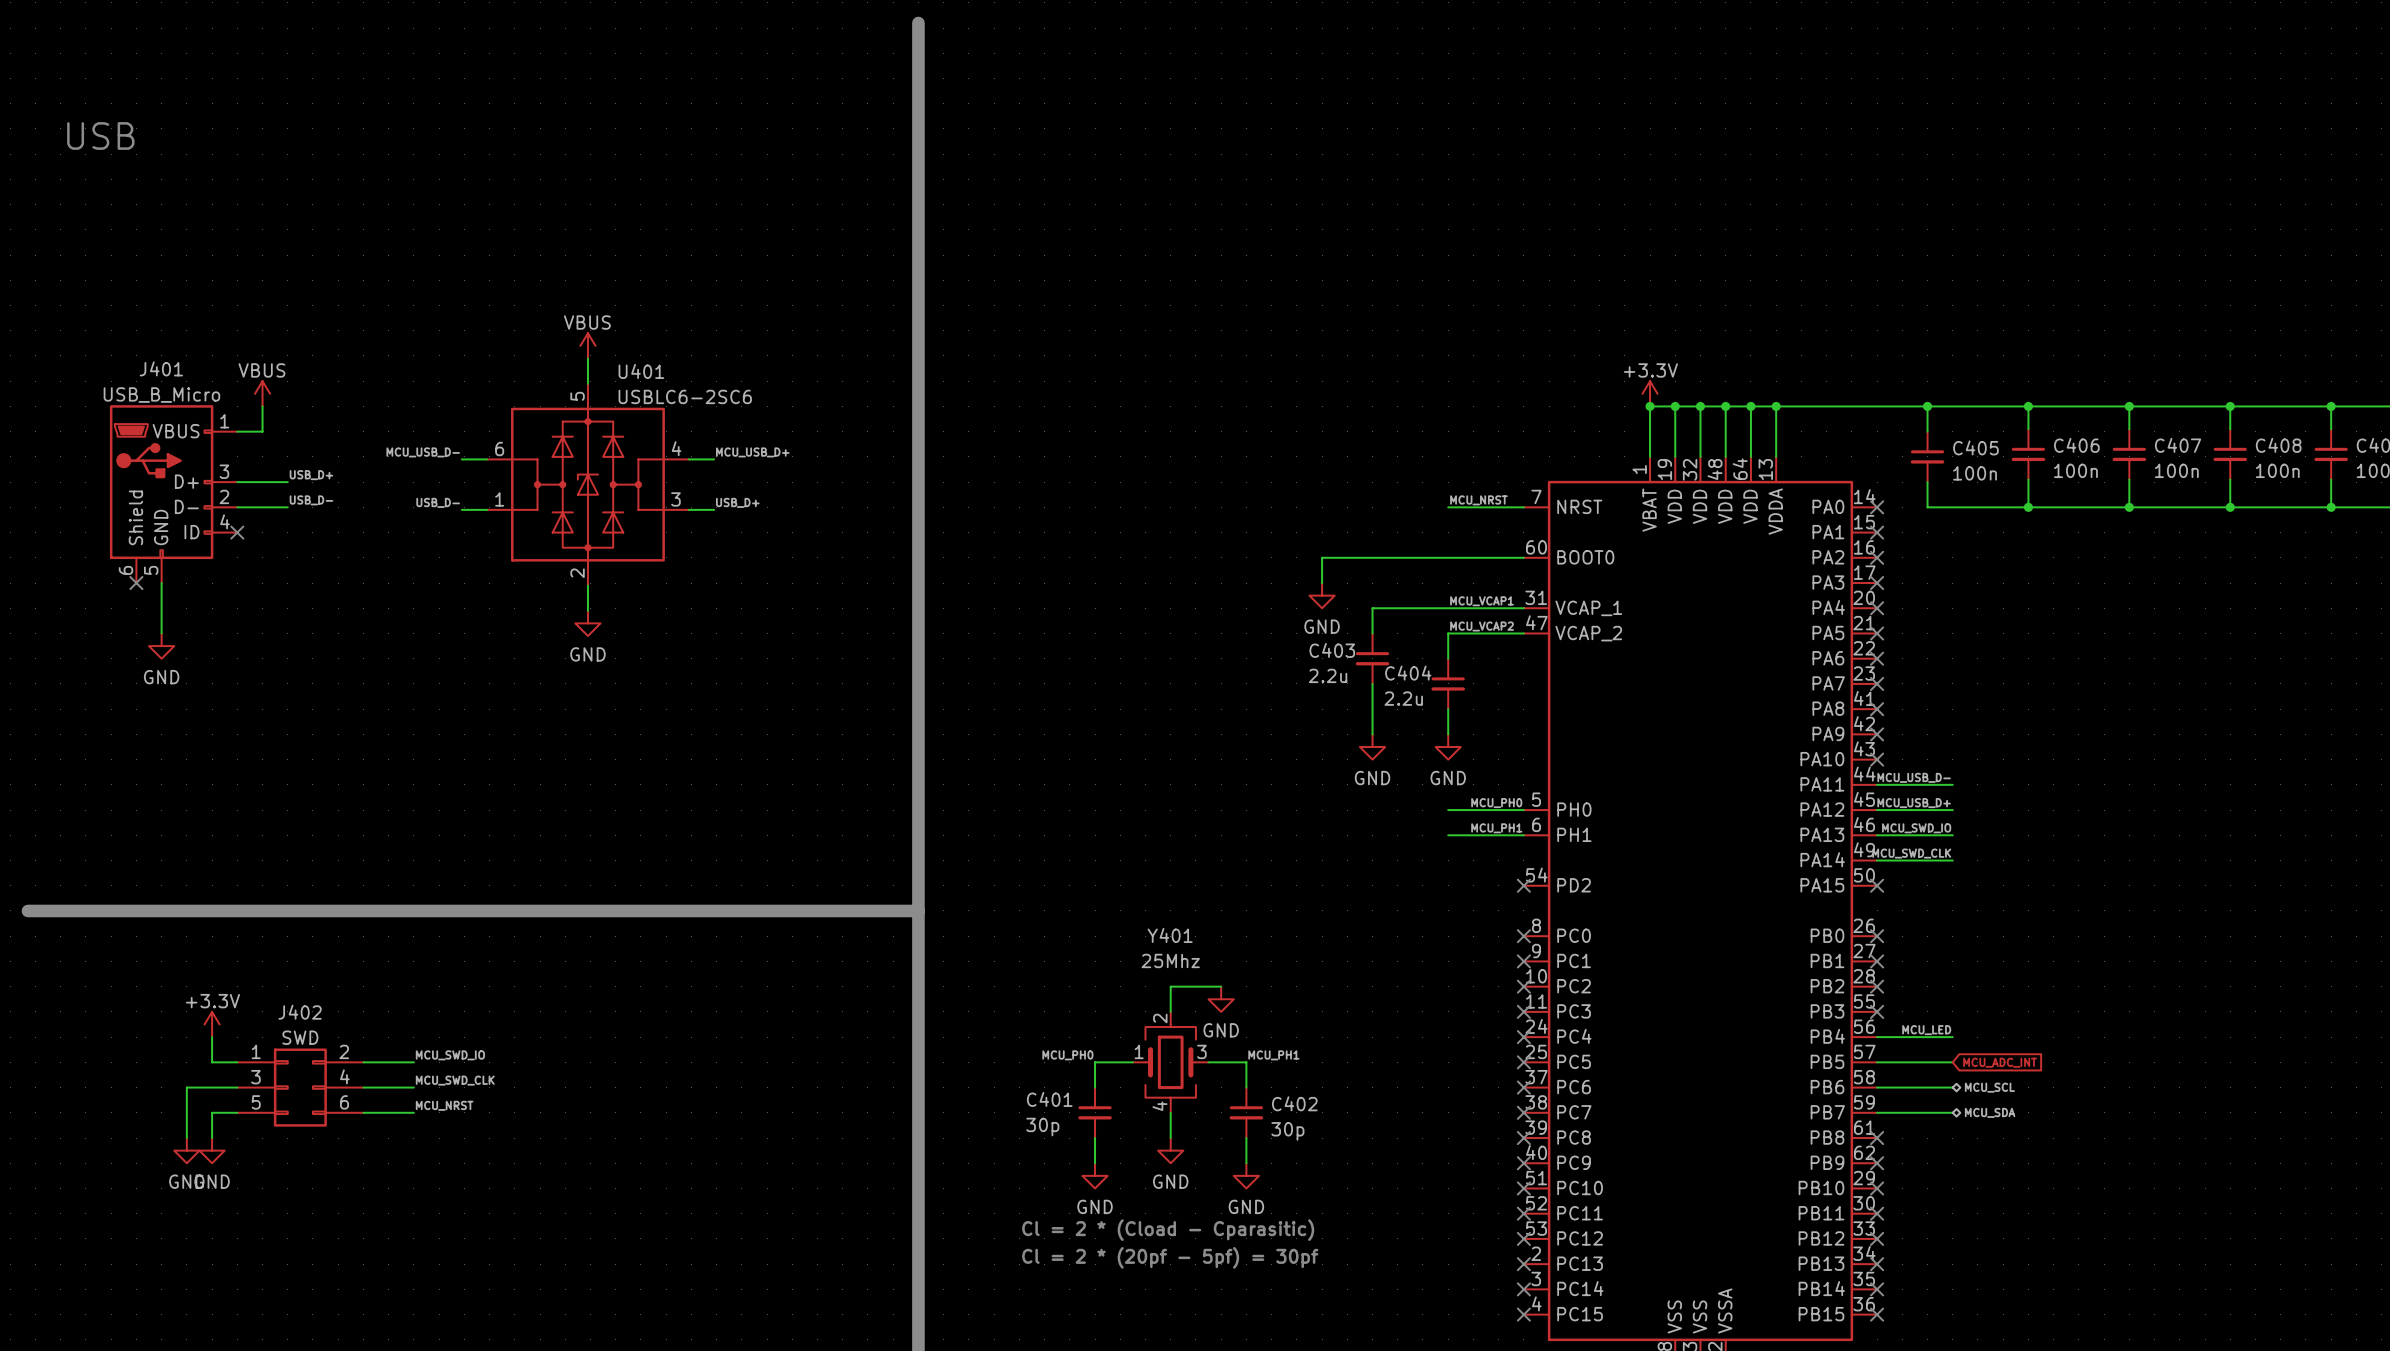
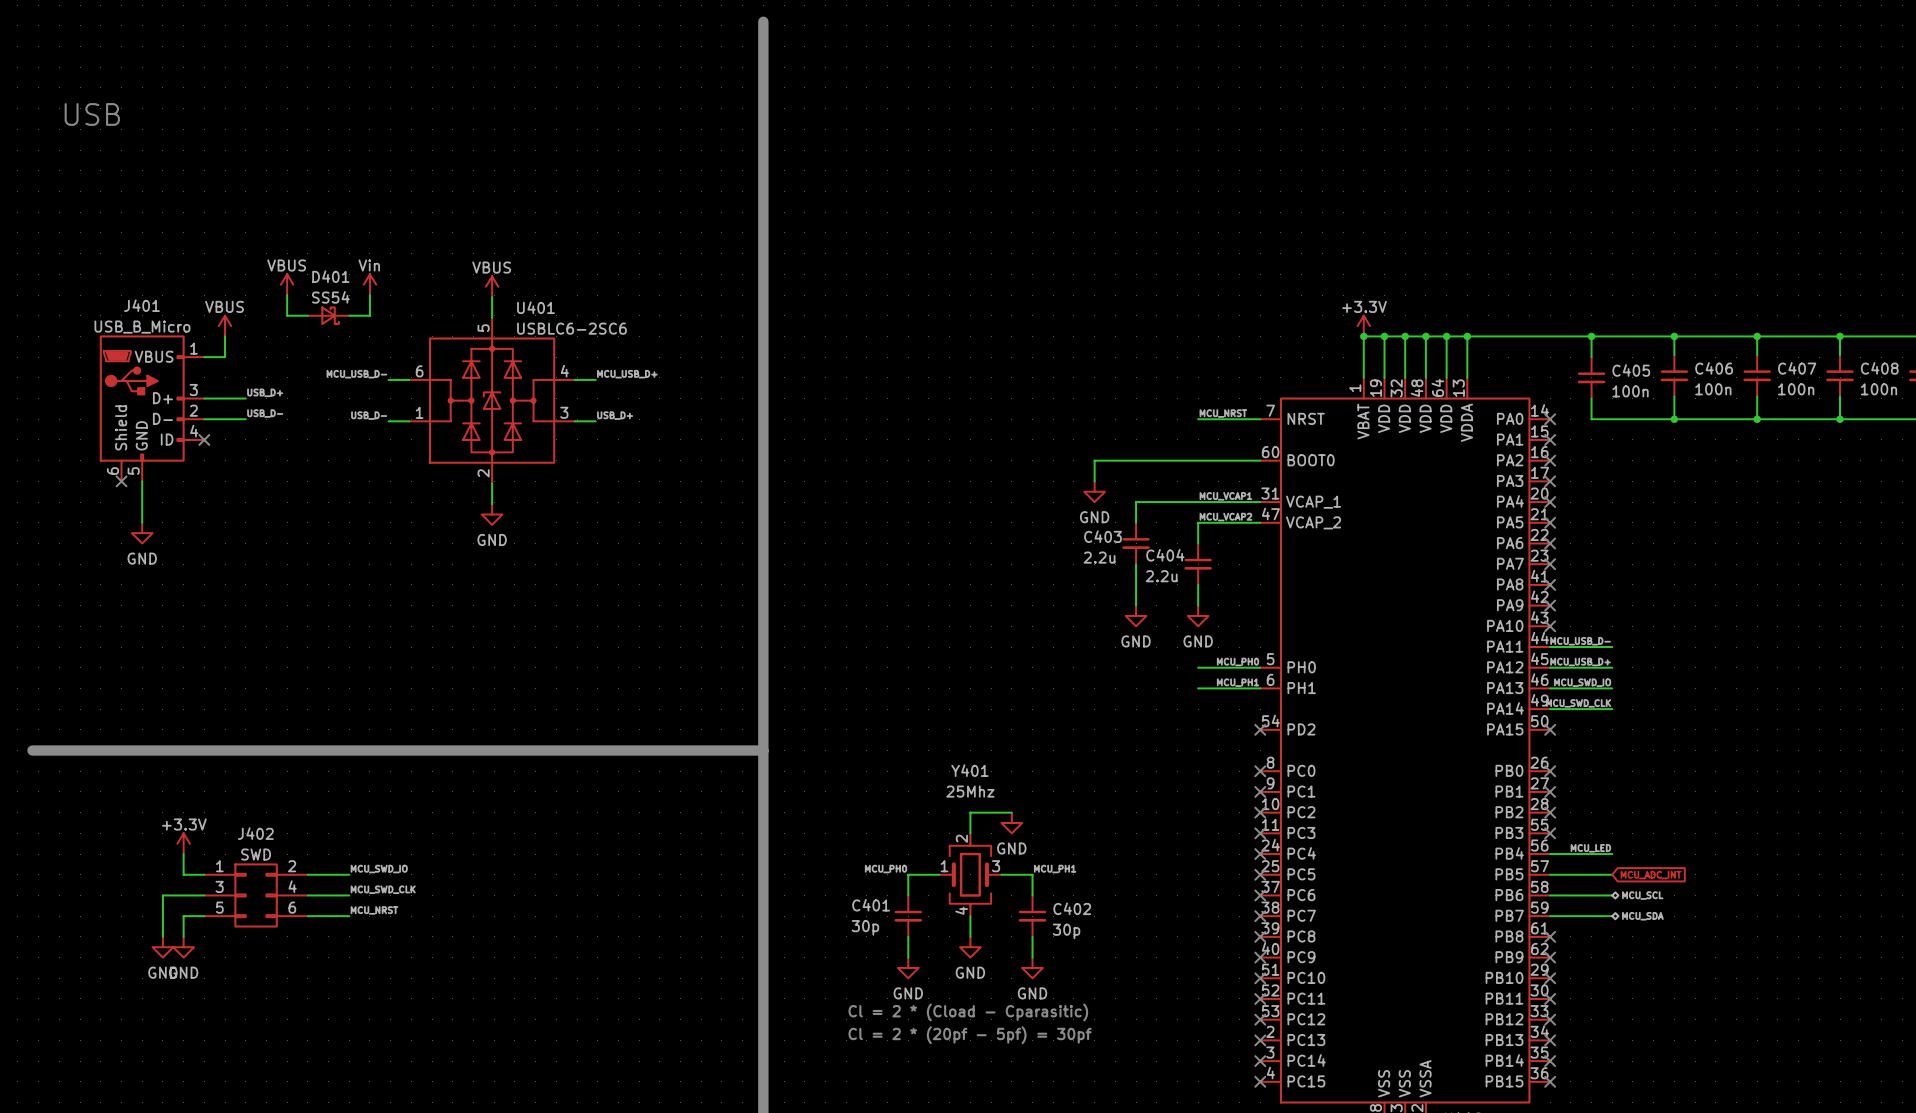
power symbol: none -> VBUS (287, 284)
power symbol: none -> Vin (369, 284)
wire: none -> (287, 295) (287, 315) (307, 315)
wire: none -> (369, 295) (369, 315) (349, 315)
D401: none -> SS54 (328, 315)

